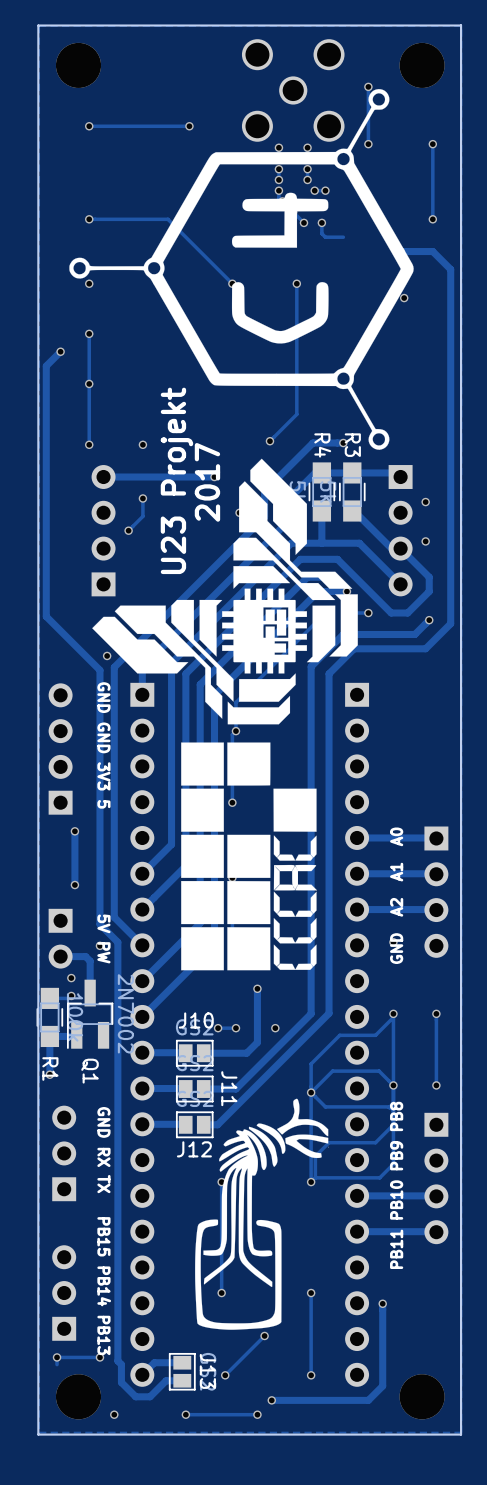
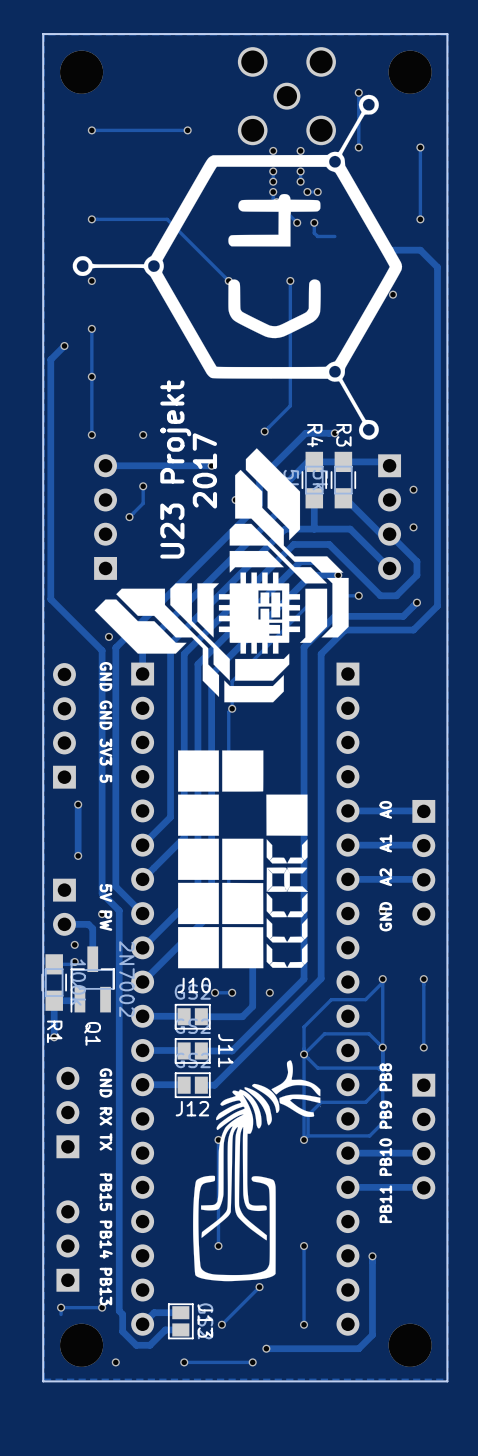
drawing position: (249, 856) -> (243, 859)

